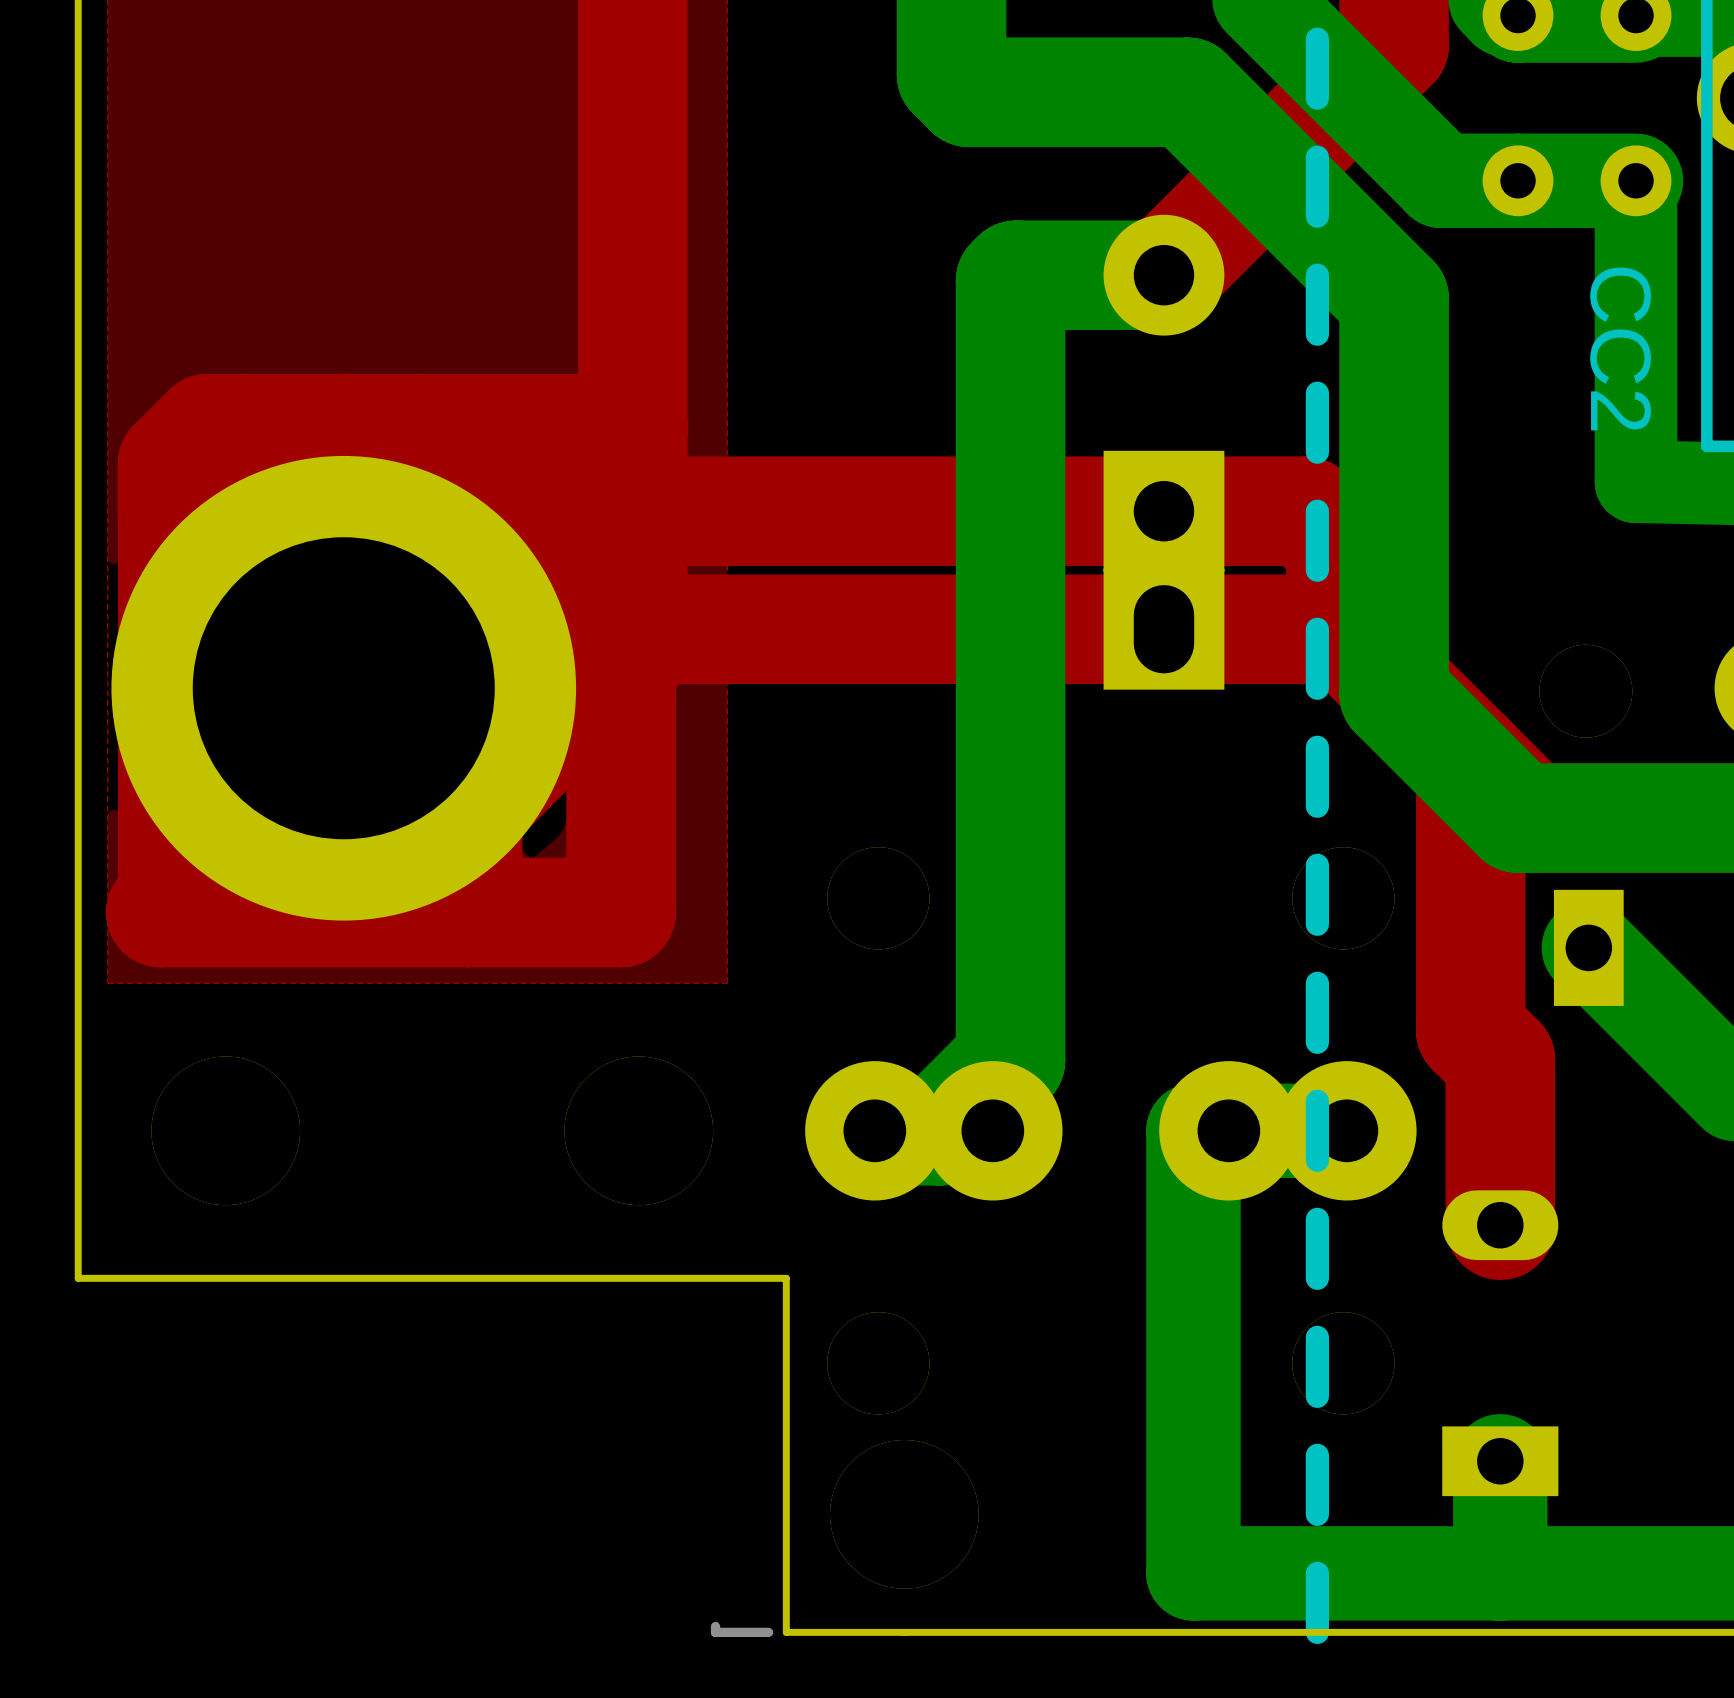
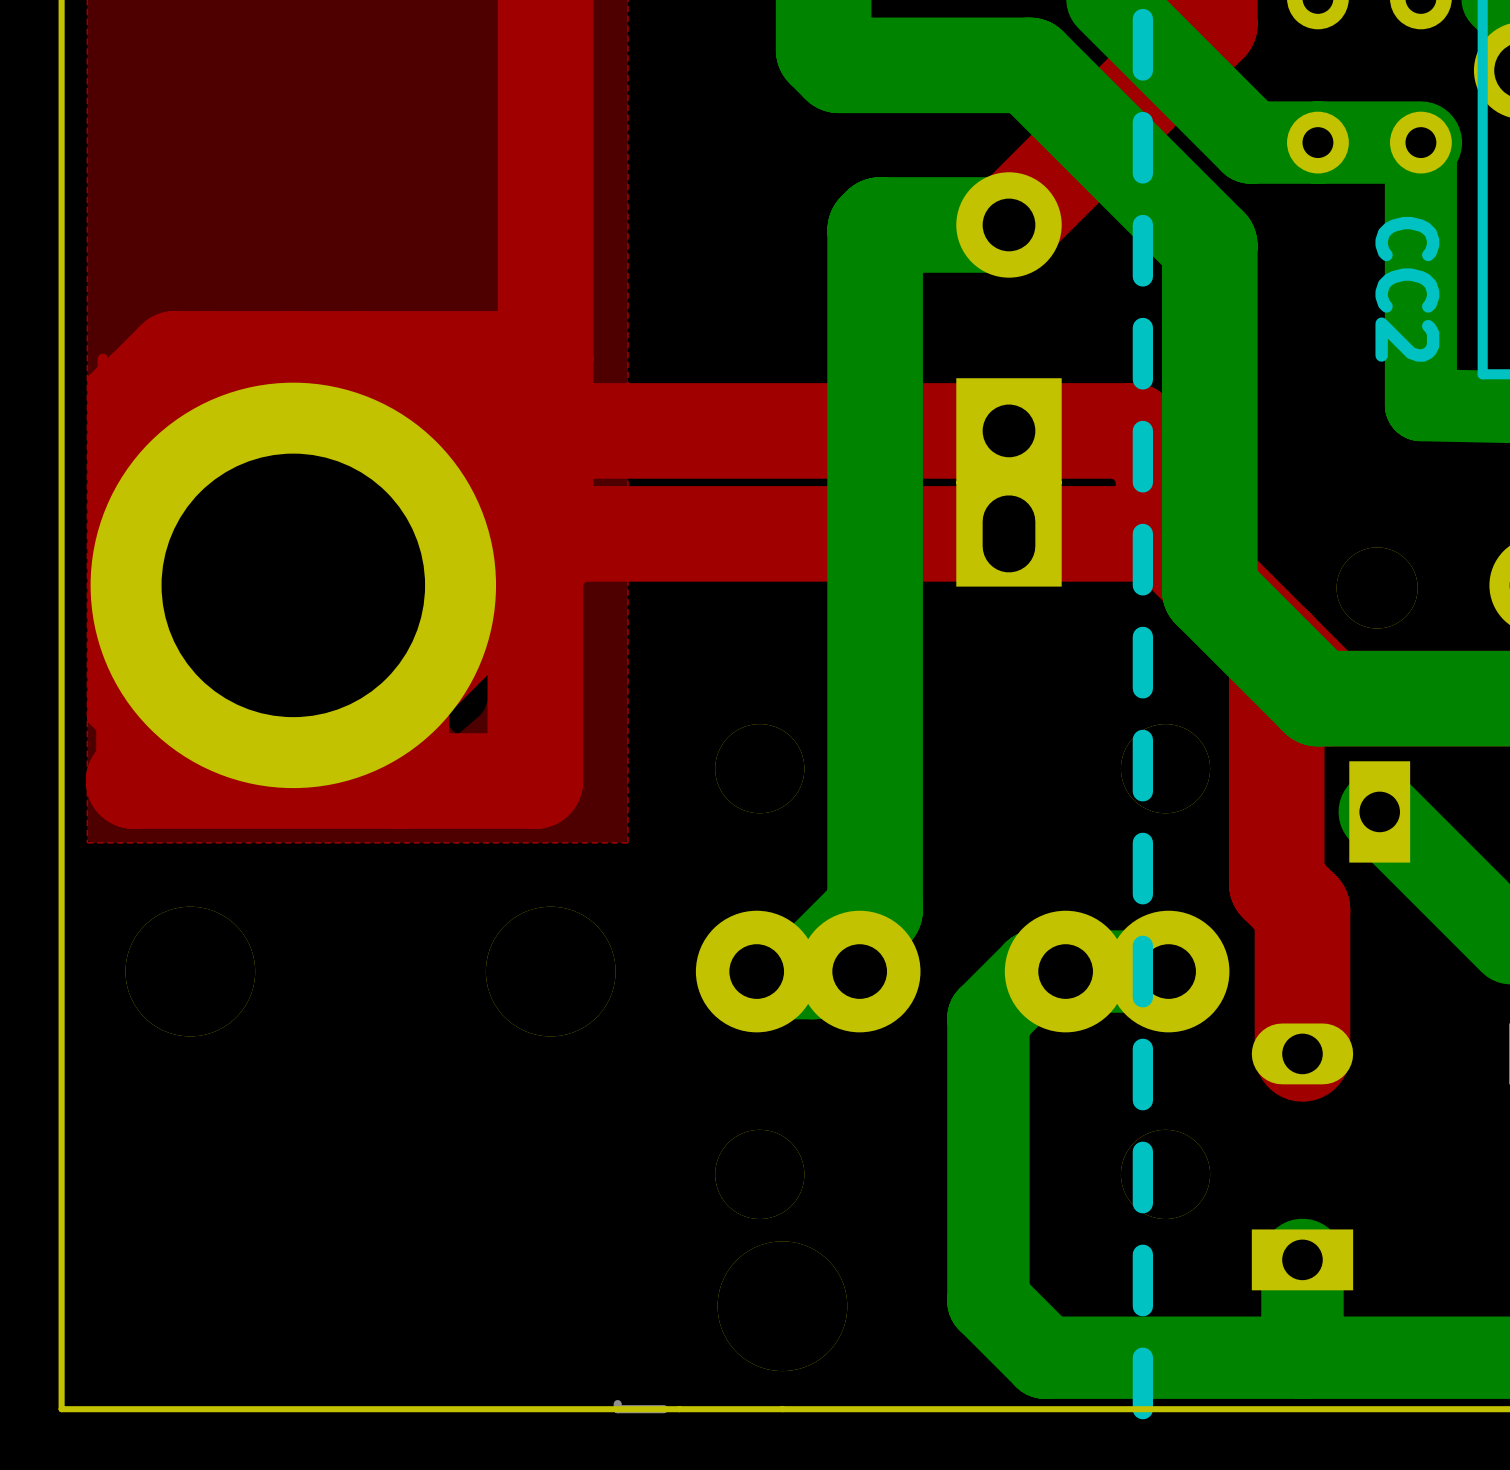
top track: none -> (102, 358) (102, 369) (92, 379) (92, 719) (133, 760) (133, 781)
bottom track: (1193, 1130) (1193, 1573) (1205, 1573) -> (1034, 971) (988, 1017) (988, 1301) (1045, 1357)
board edge: (78, 1278) (786, 1278) (786, 1632) -> (61, 1100) (61, 1409) (679, 1409)

